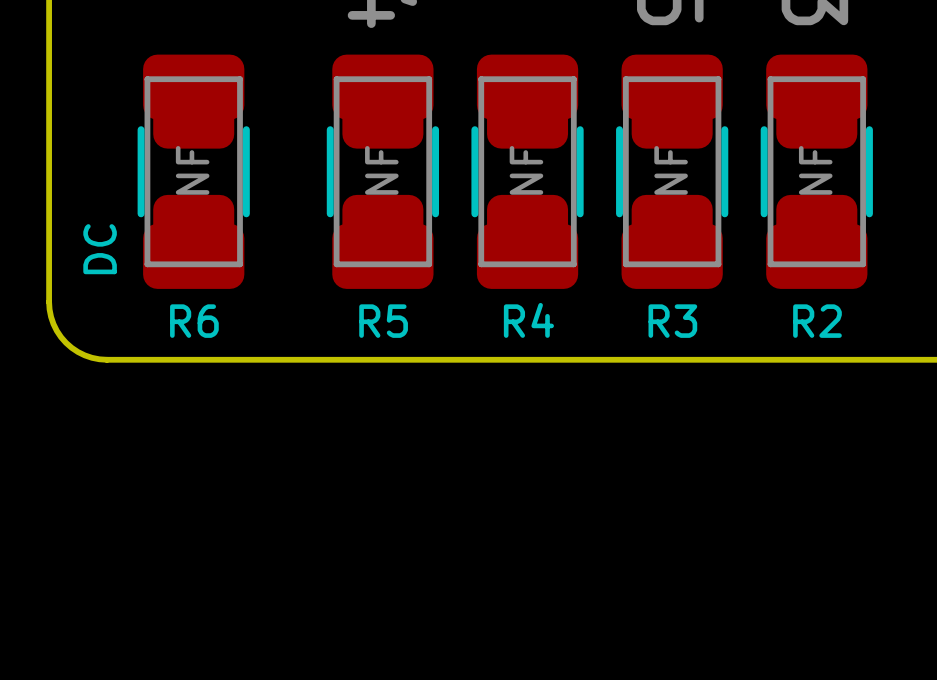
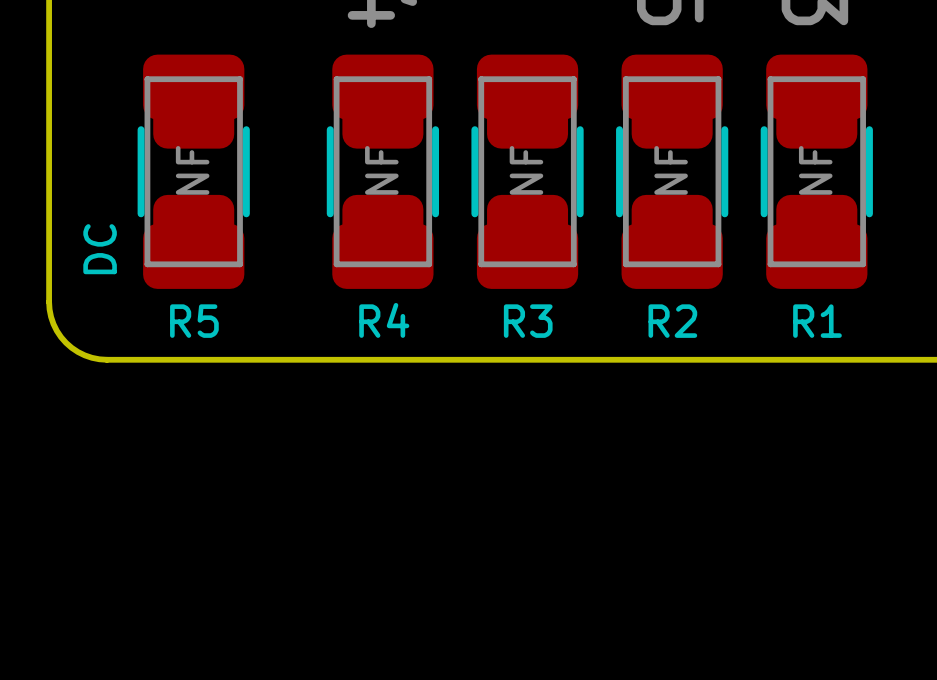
R4 name: R4 (528, 320) -> R3 (528, 321)
R6 name: R6 (194, 321) -> R5 (194, 321)
R5 name: R5 (383, 321) -> R4 (384, 320)
R3 name: R3 (672, 321) -> R2 (672, 321)
R2 name: R2 (817, 321) -> R1 (817, 321)

